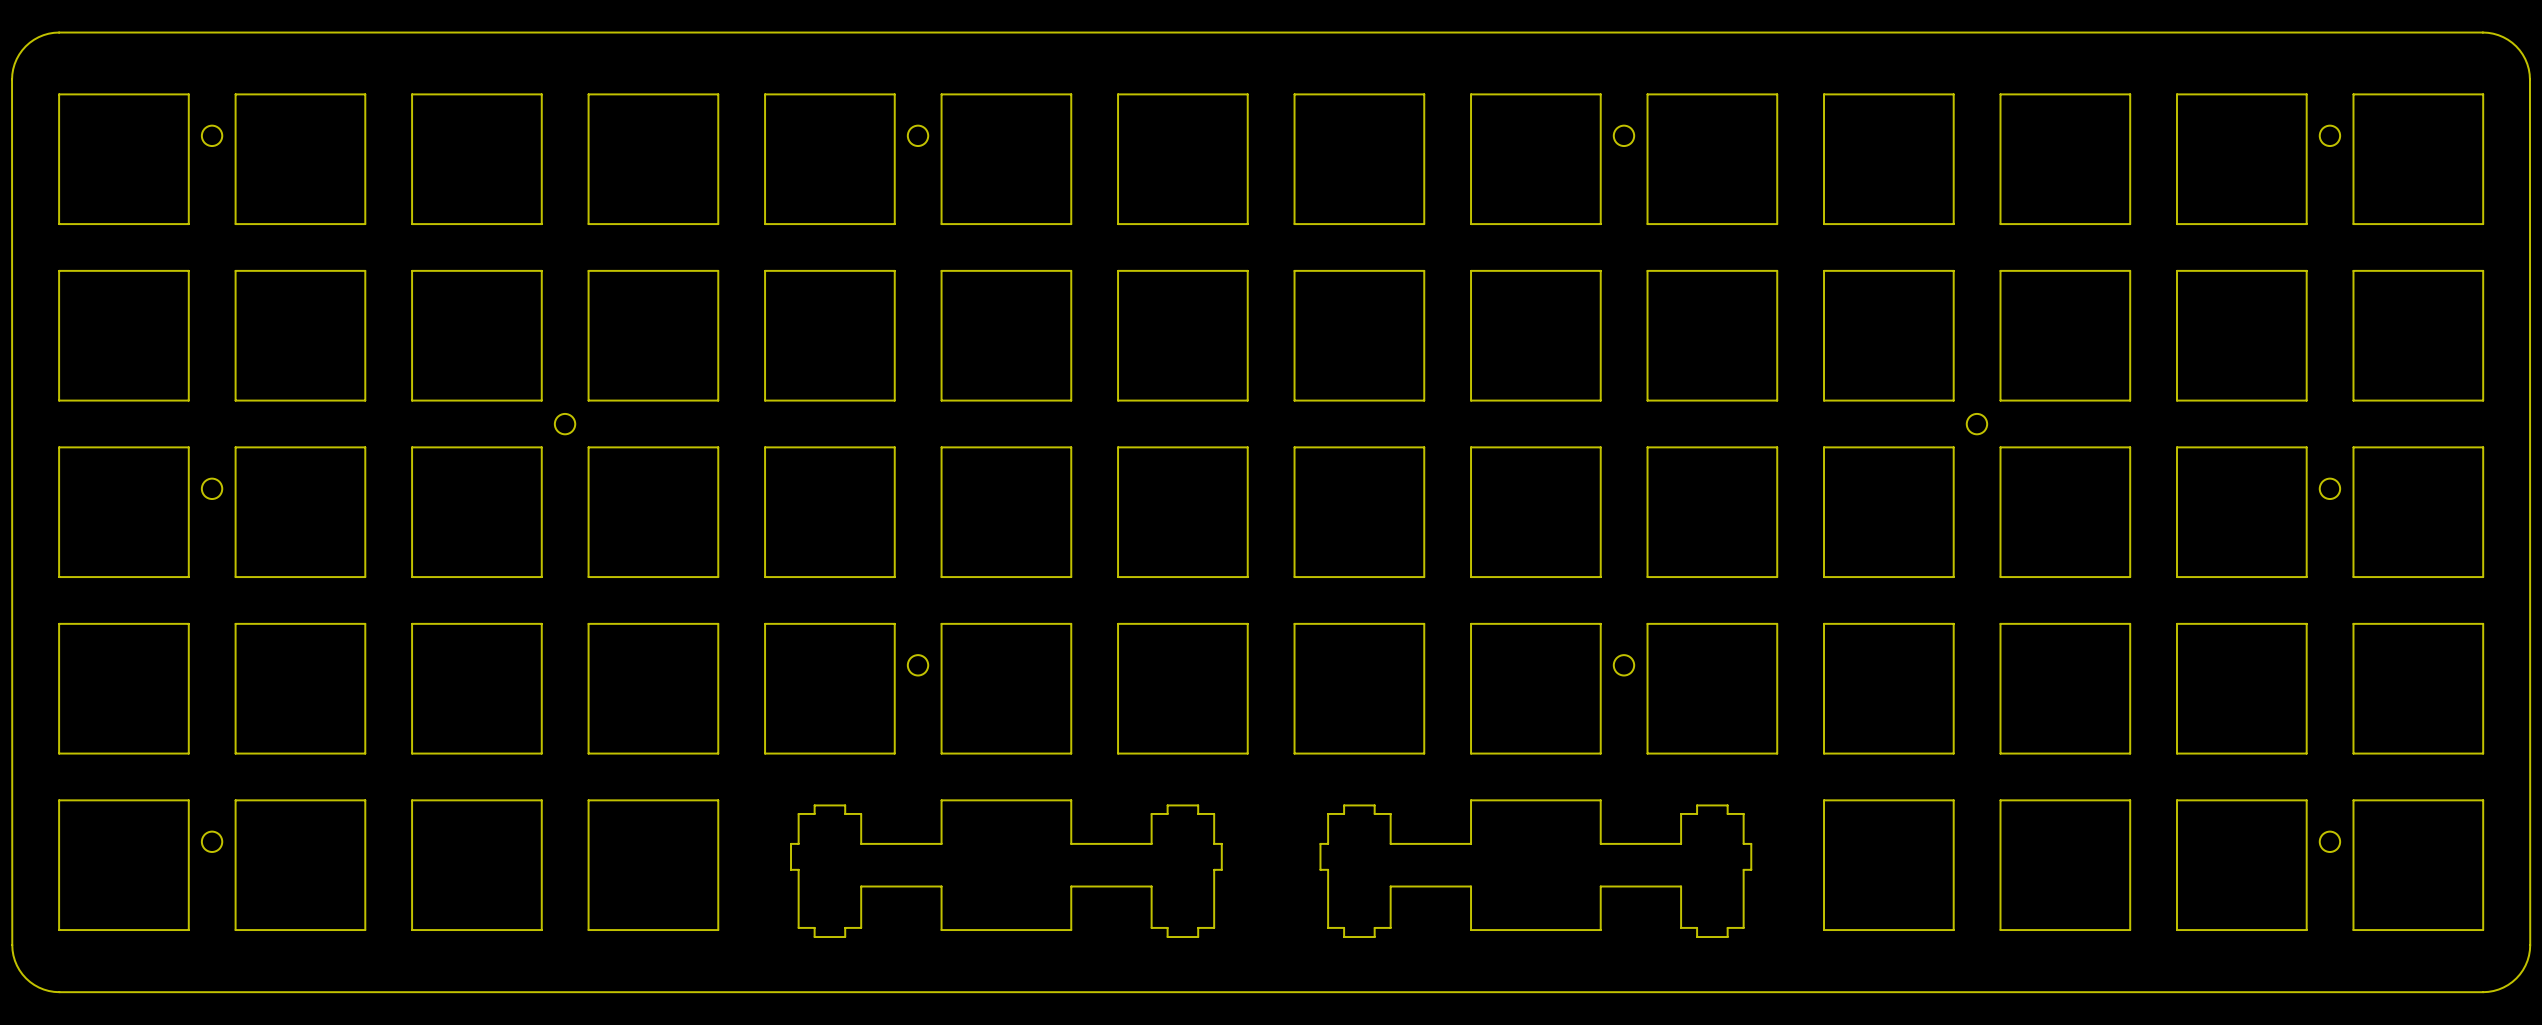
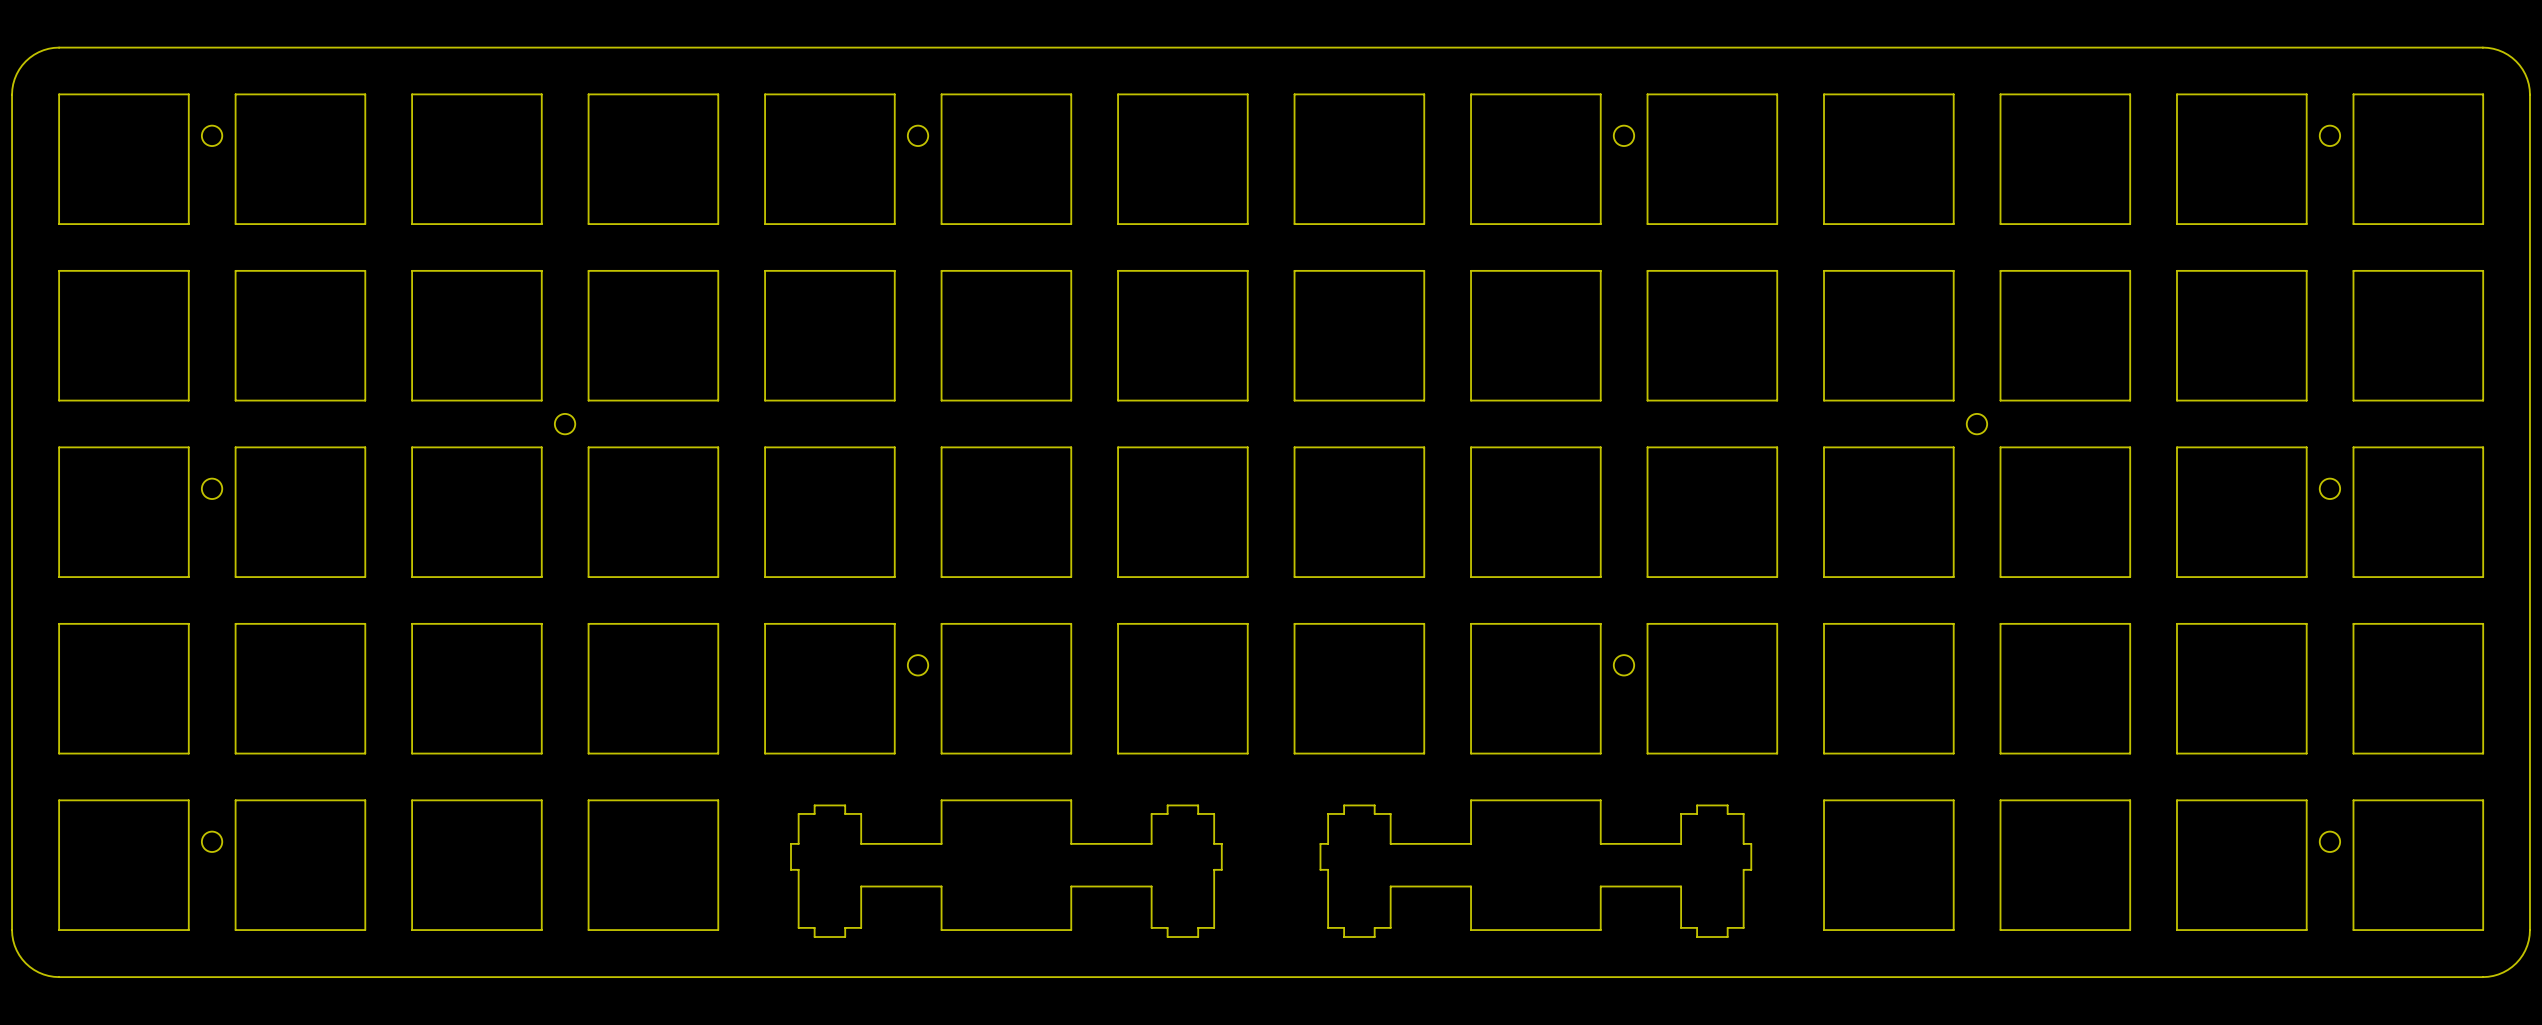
board edge: (2482, 32) (59, 32) (43, 35) (29, 42) (22, 50) (14, 64) (12, 79) (12, 945) (14, 960) (22, 974) (34, 984) (48, 990) (59, 992) (2483, 992) (2498, 989) (2512, 981) (2523, 970) (2529, 955) (2530, 945) (2529, 79) (2525, 59) (2516, 46) (2503, 37) (2482, 32) -> (2482, 47) (2503, 52) (2516, 61) (2525, 74) (2529, 94) (2529, 930) (2527, 945) (2519, 959) (2507, 969) (2498, 974) (2482, 977) (59, 977) (43, 974) (34, 969) (22, 959) (14, 945) (12, 930) (12, 94) (13, 84) (19, 69) (29, 57) (43, 50) (59, 47) (2482, 47)

